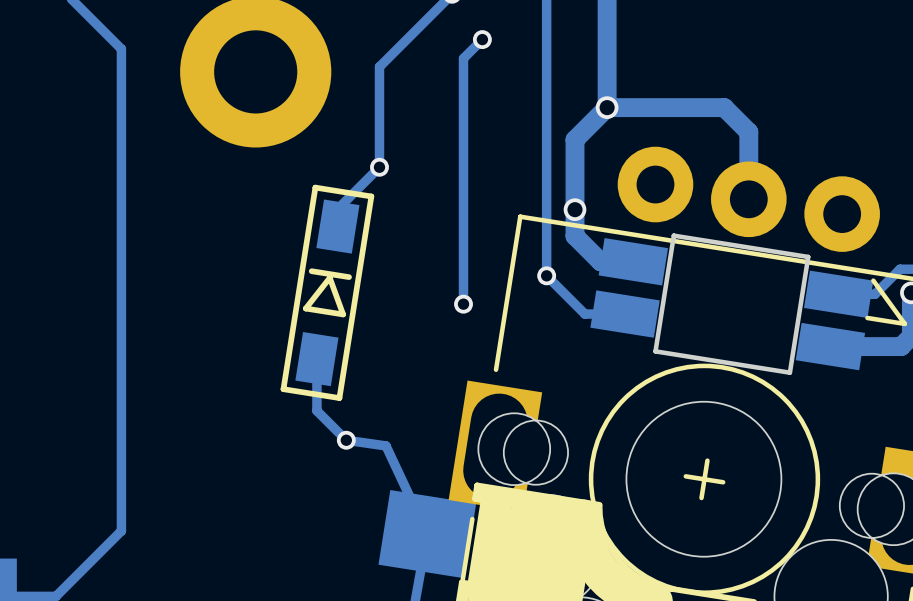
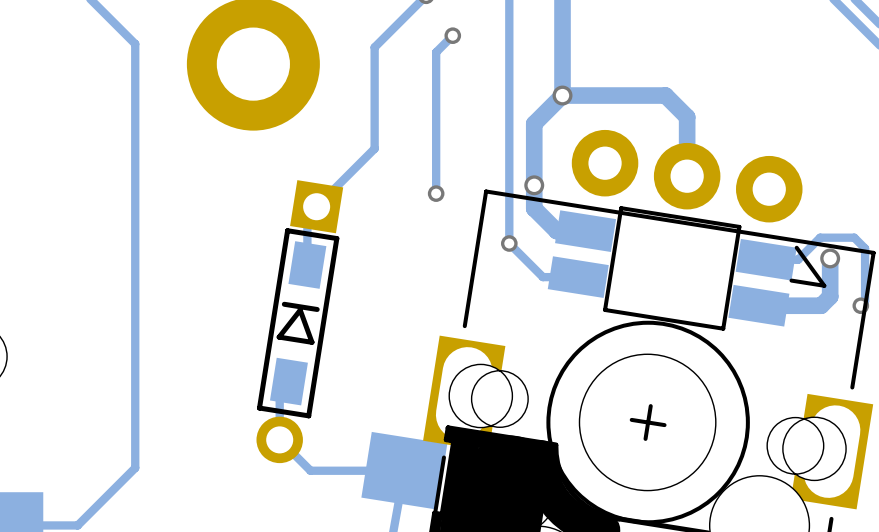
track: (393, 52) (379, 66) (379, 167) (337, 208) (337, 226) -> (374, 47) (374, 148) (307, 215) (307, 265)
via: (379, 167) -> none
track: (463, 219) (463, 304) -> none
via: none -> (436, 193)
part: (327, 292) -> none
via: (463, 304) -> none
track: (316, 359) (316, 410) (346, 440) (386, 445) (427, 534) -> (288, 381) (279, 390) (279, 439) (310, 470) (404, 470)
part: none -> (299, 321)
via: (346, 440) -> none

